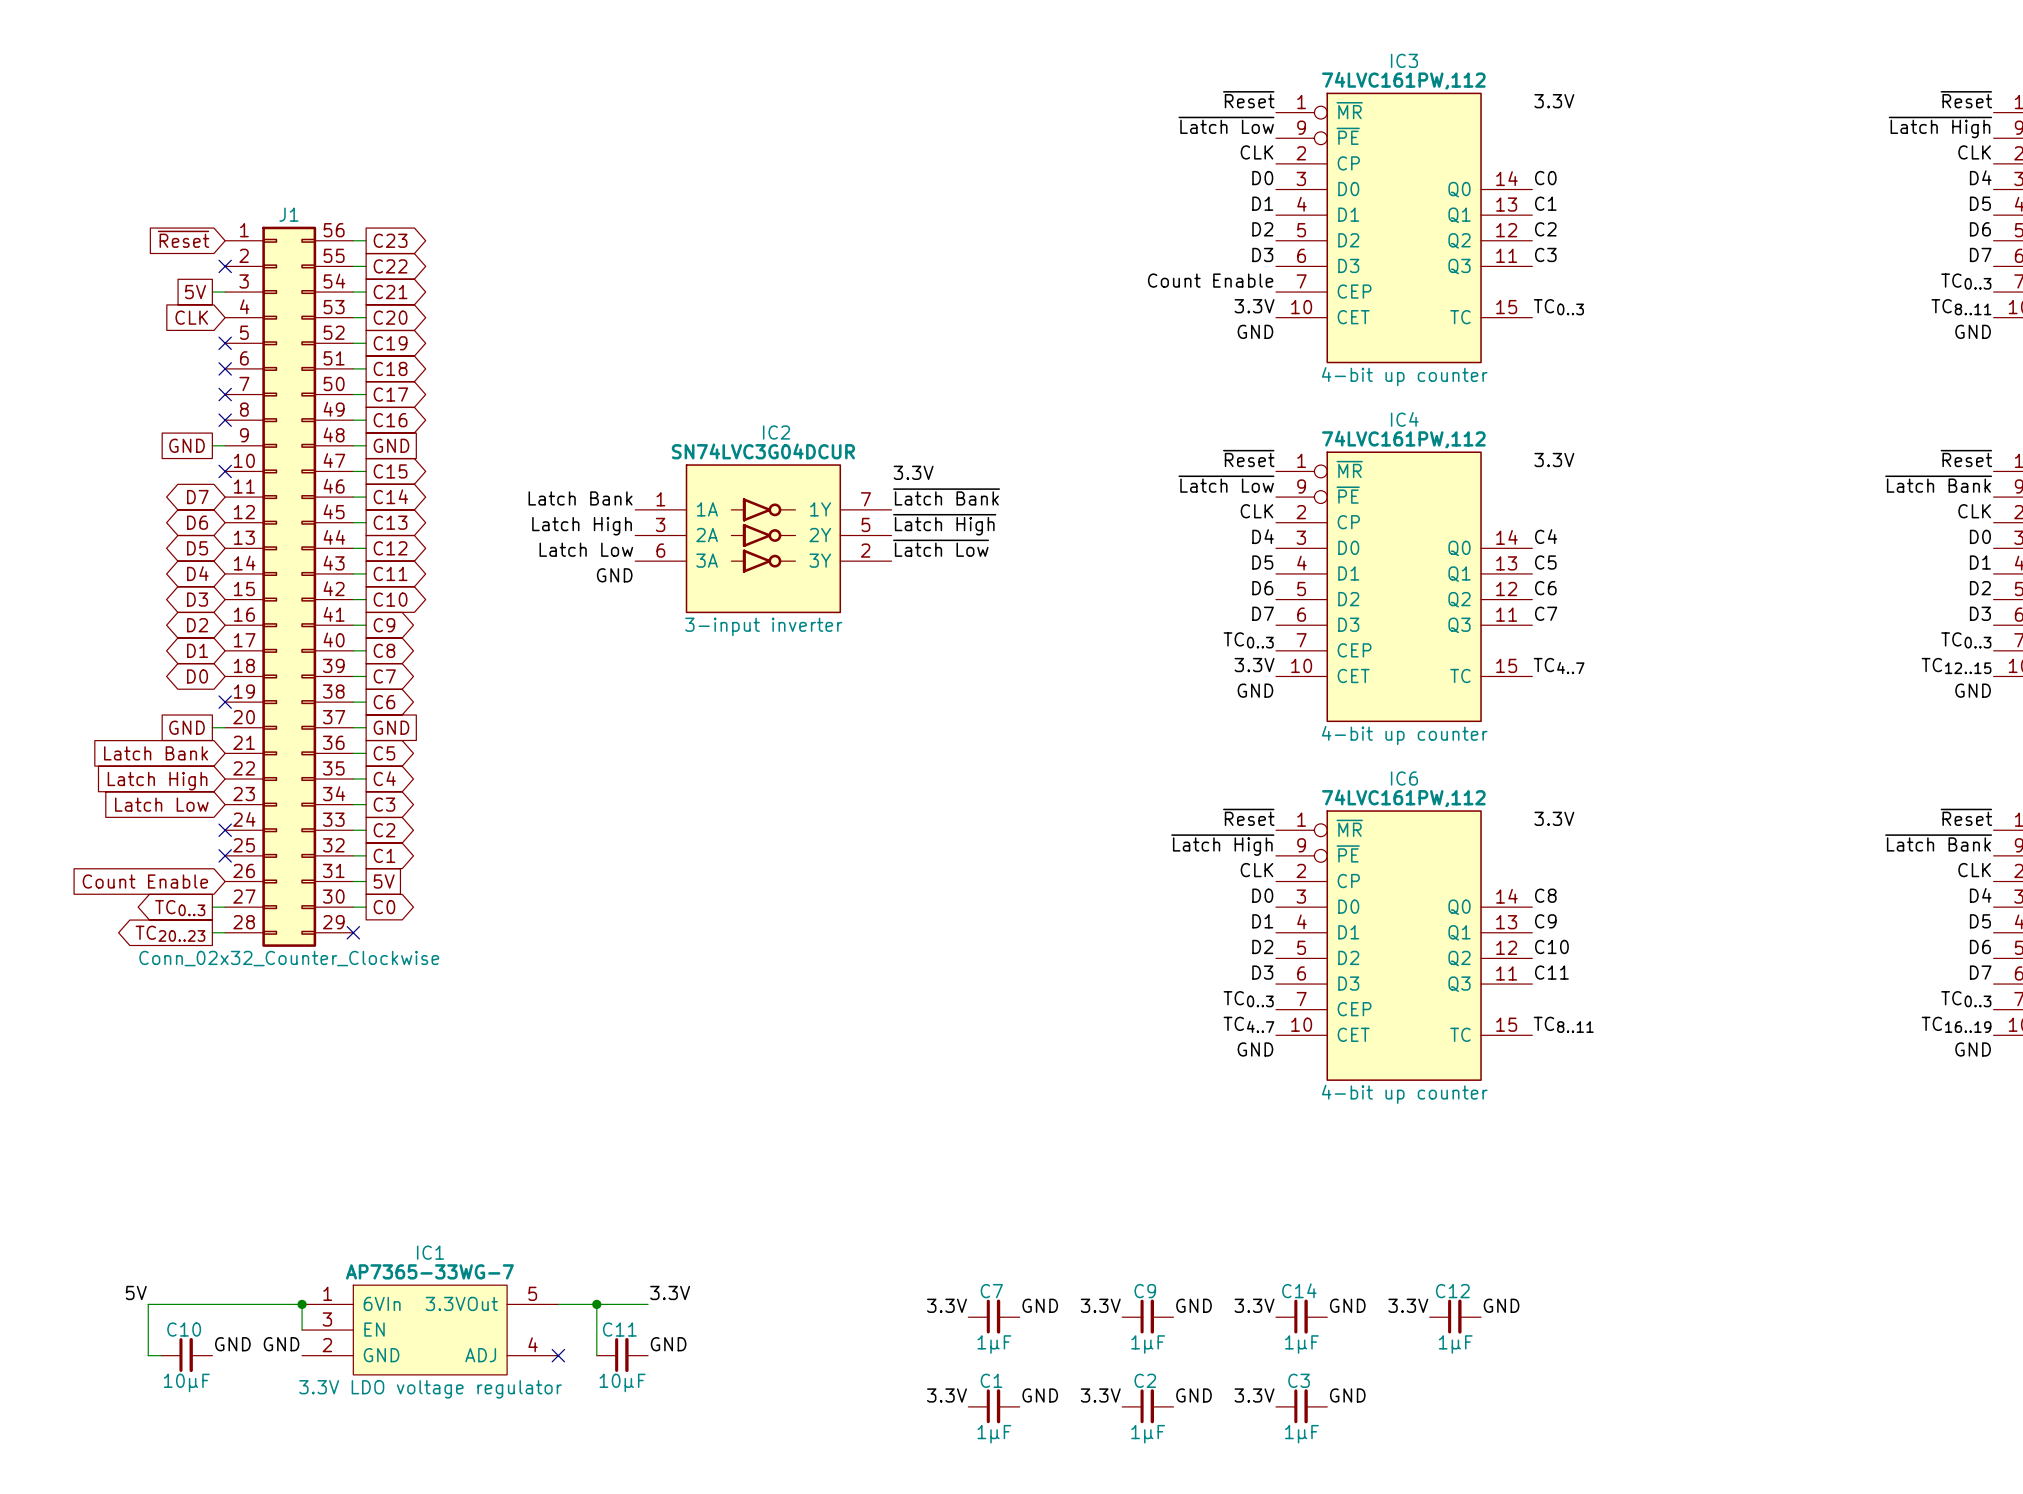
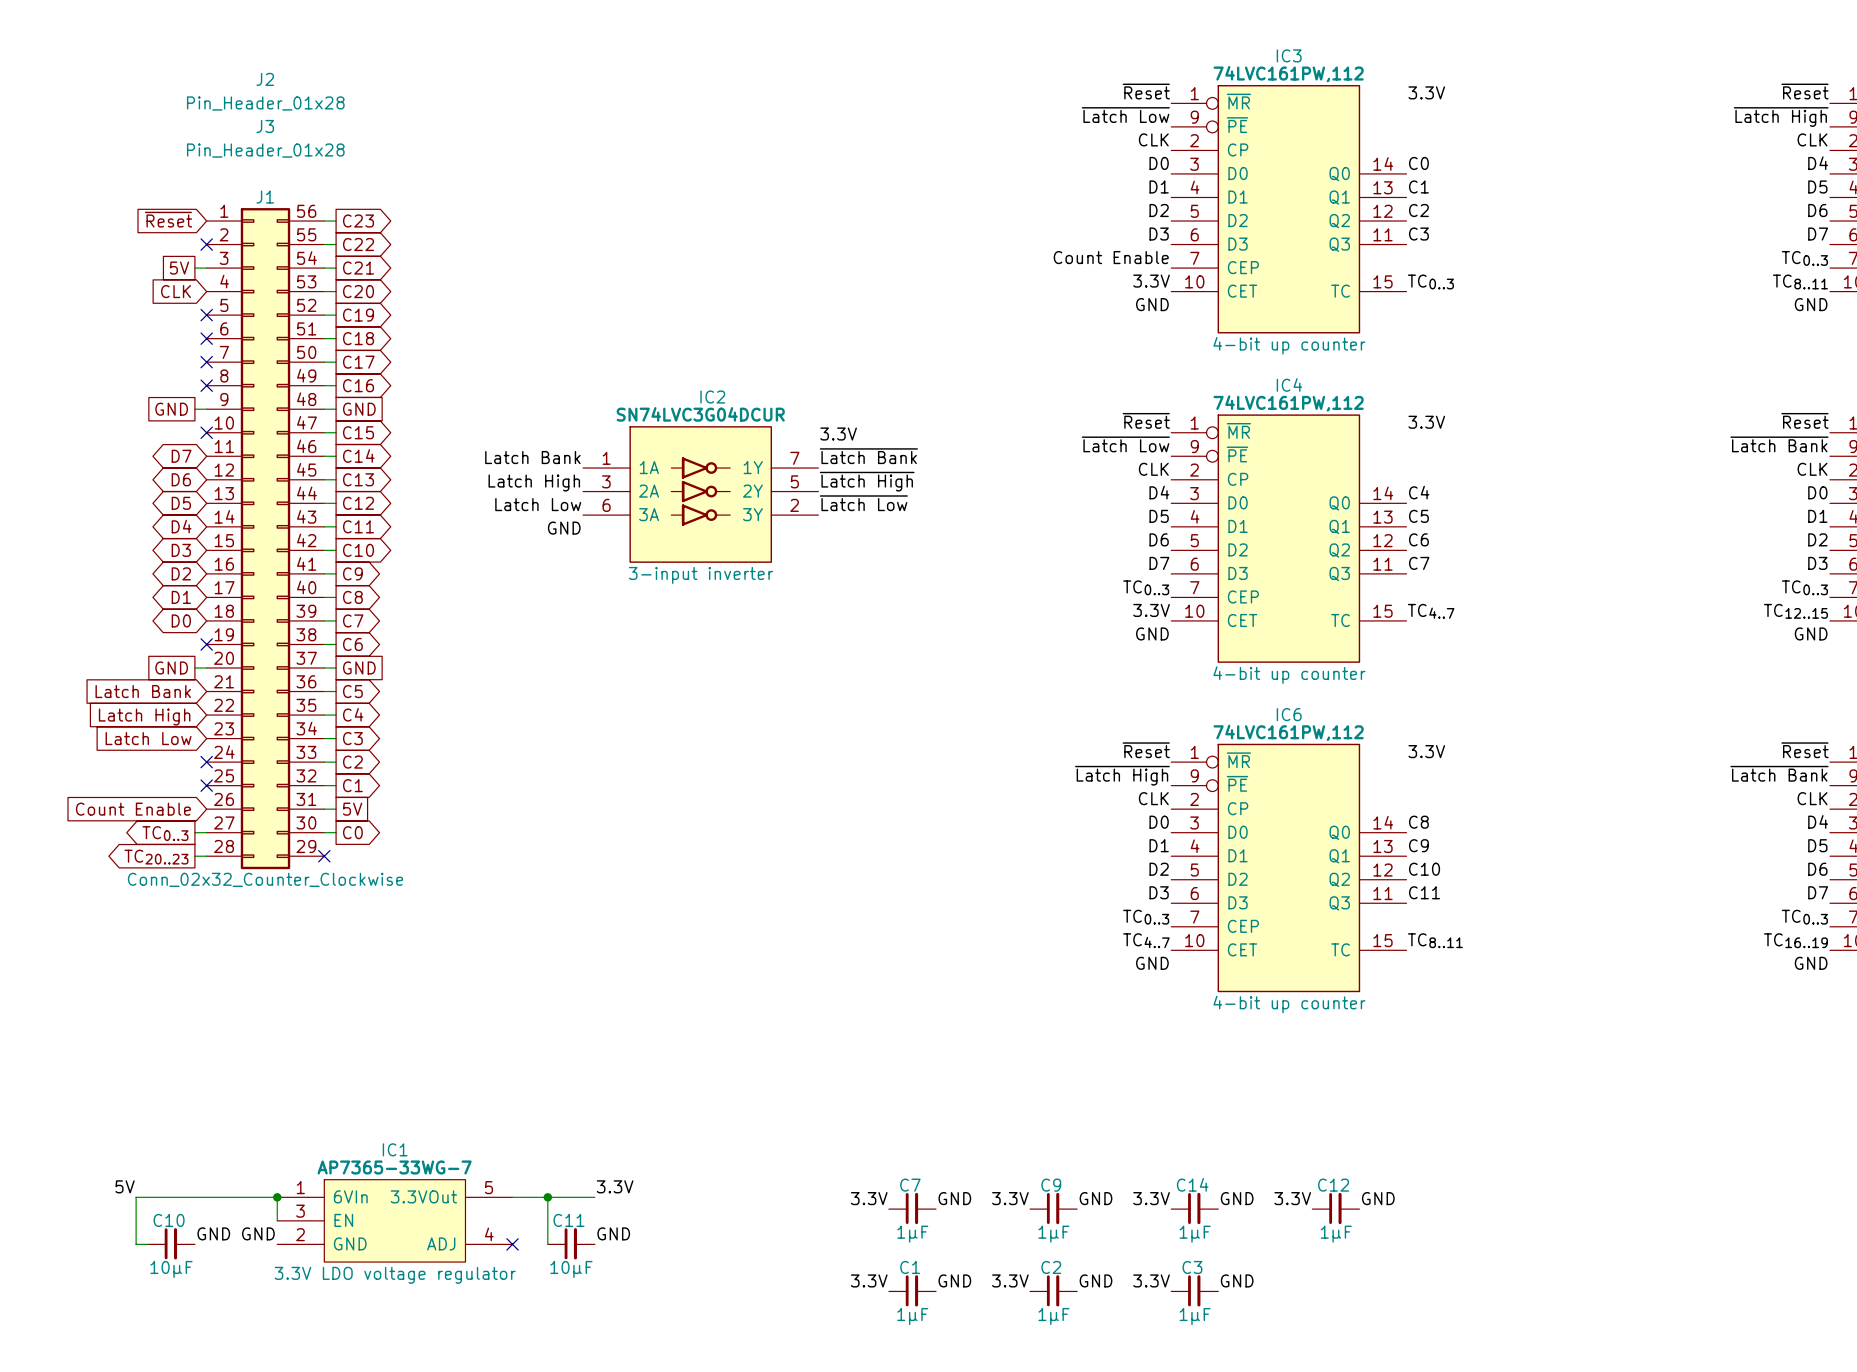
J2: none -> Pin_Header_01x28 (265, 91)
J3: none -> Pin_Header_01x28 (265, 138)

